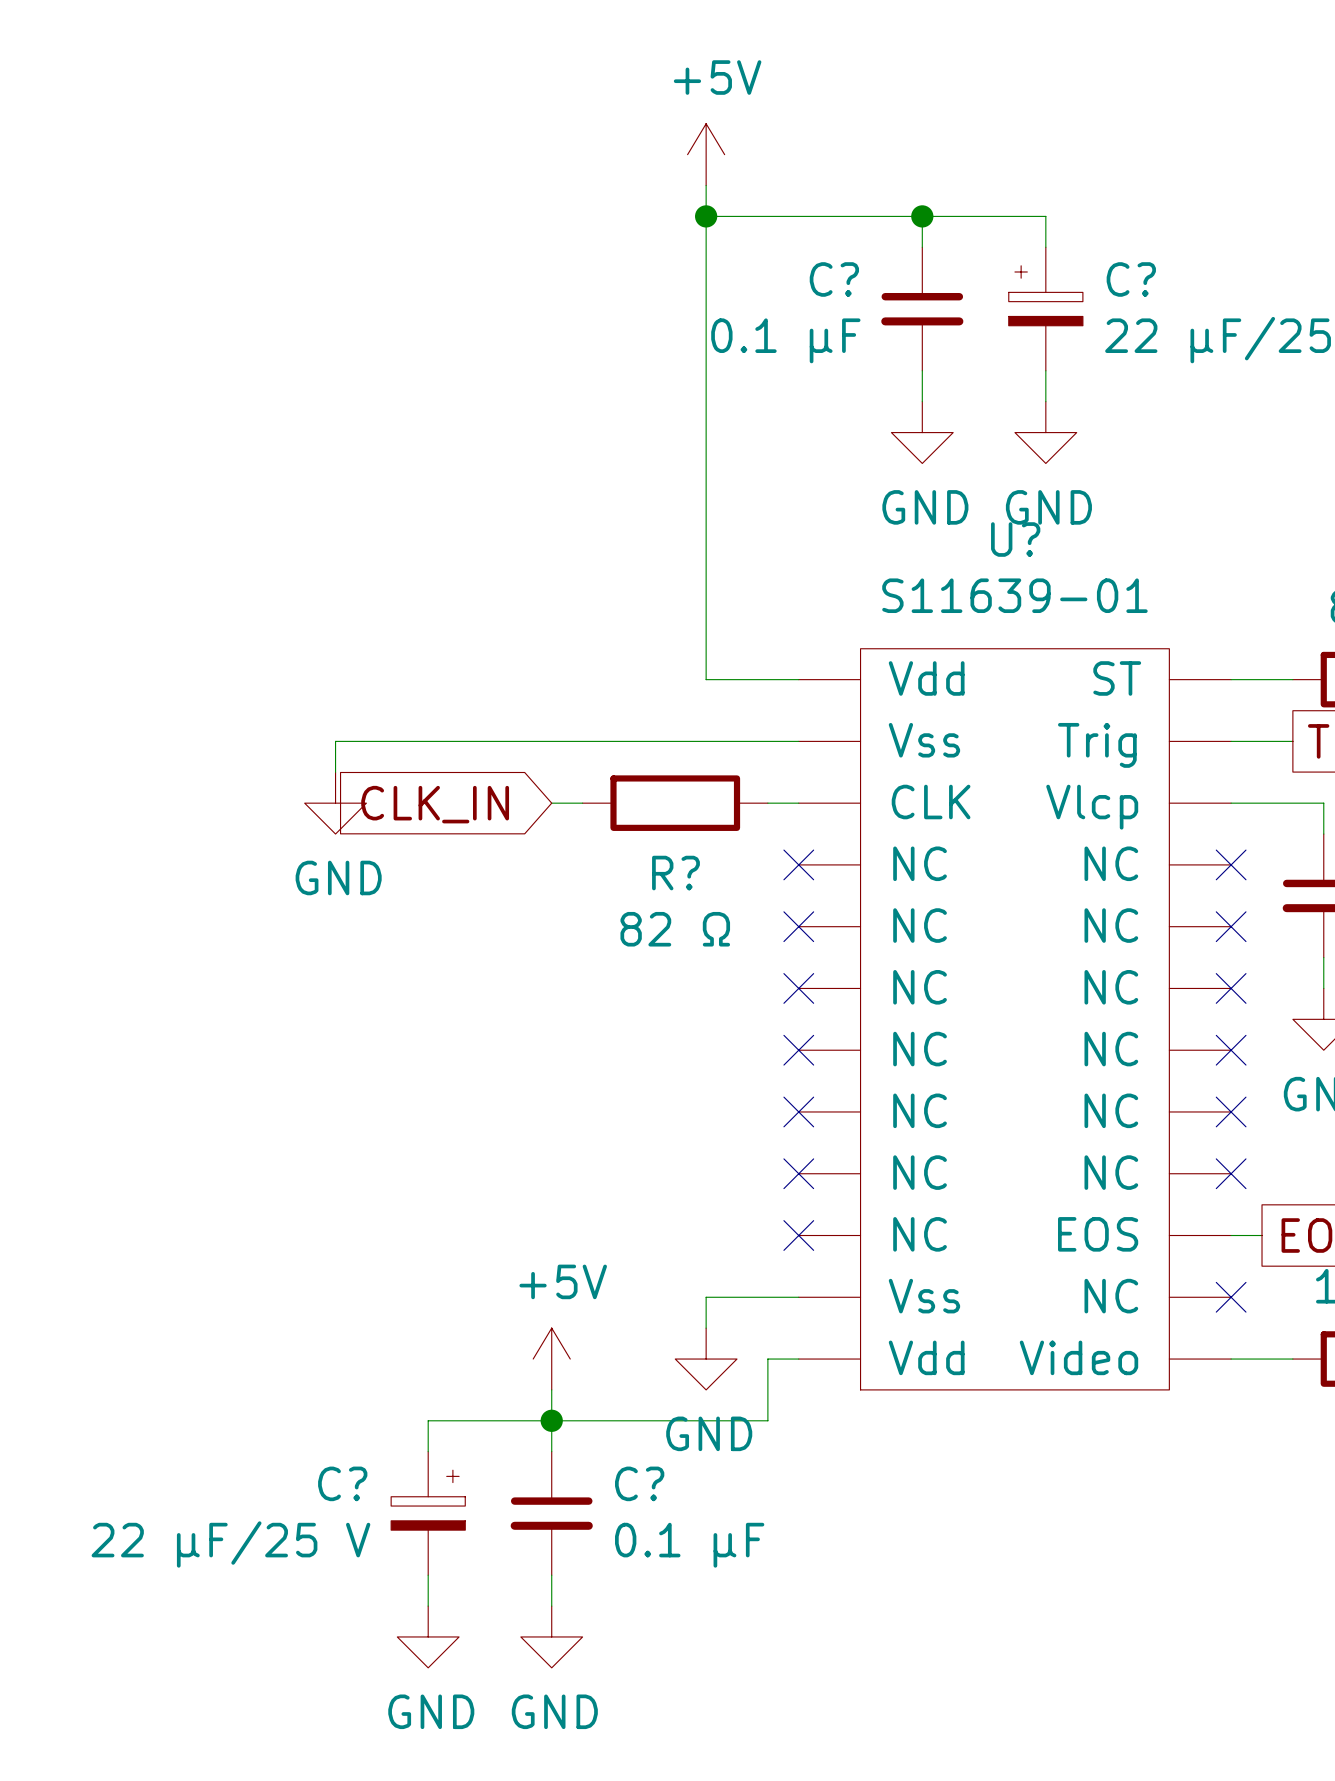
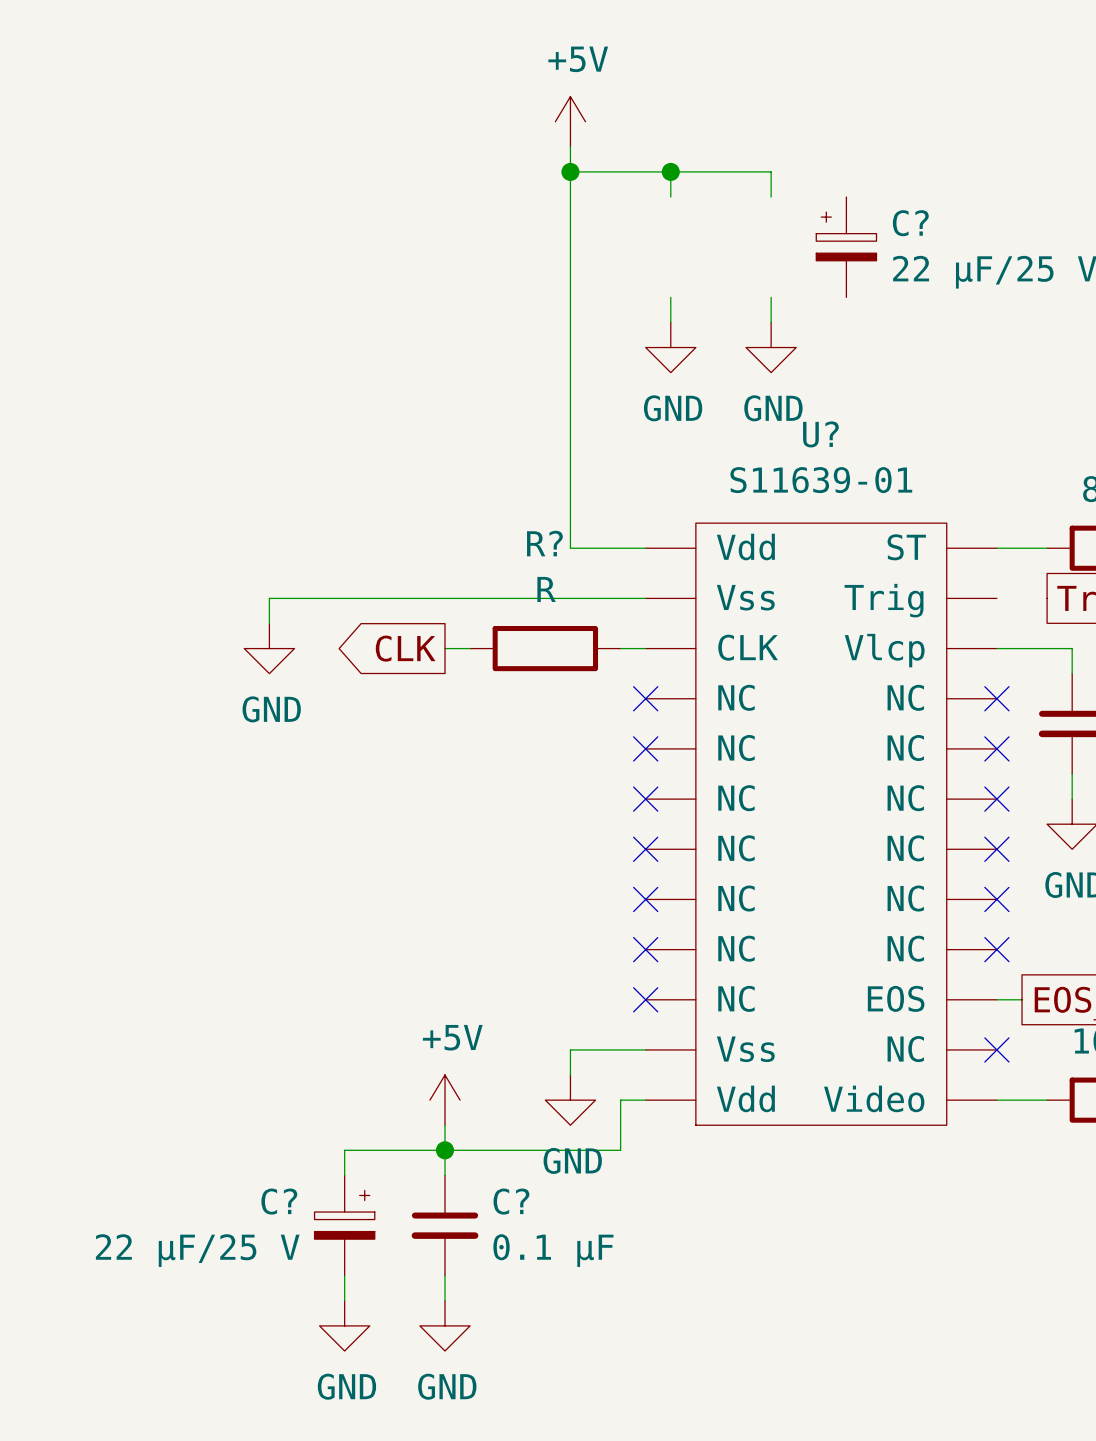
wire: (922, 216) (922, 247) -> (670, 171) (670, 197)
junction position: (922, 216) -> (670, 171)
wire: (953, 216) (1045, 216) (1045, 247) -> (771, 171) (771, 197)
C?: 0.1 µF (922, 309) -> none
wire: (922, 370) (922, 401) -> (670, 297) (670, 322)
wire: (1045, 370) (1045, 401) -> (771, 297) (771, 322)
power symbol: none -> GND (670, 347)
power symbol position: GND (922, 432) -> GND (771, 347)
power symbol: GND (1045, 432) -> none
wire: (1231, 741) (1292, 741) -> none
global label shape: input (435, 804) -> output (405, 648)
global label: CLK_IN (435, 804) -> CLK (405, 648)
R? name position: R? (675, 873) -> R? (544, 543)
R? value: 82 Ω (675, 929) -> R (546, 589)

